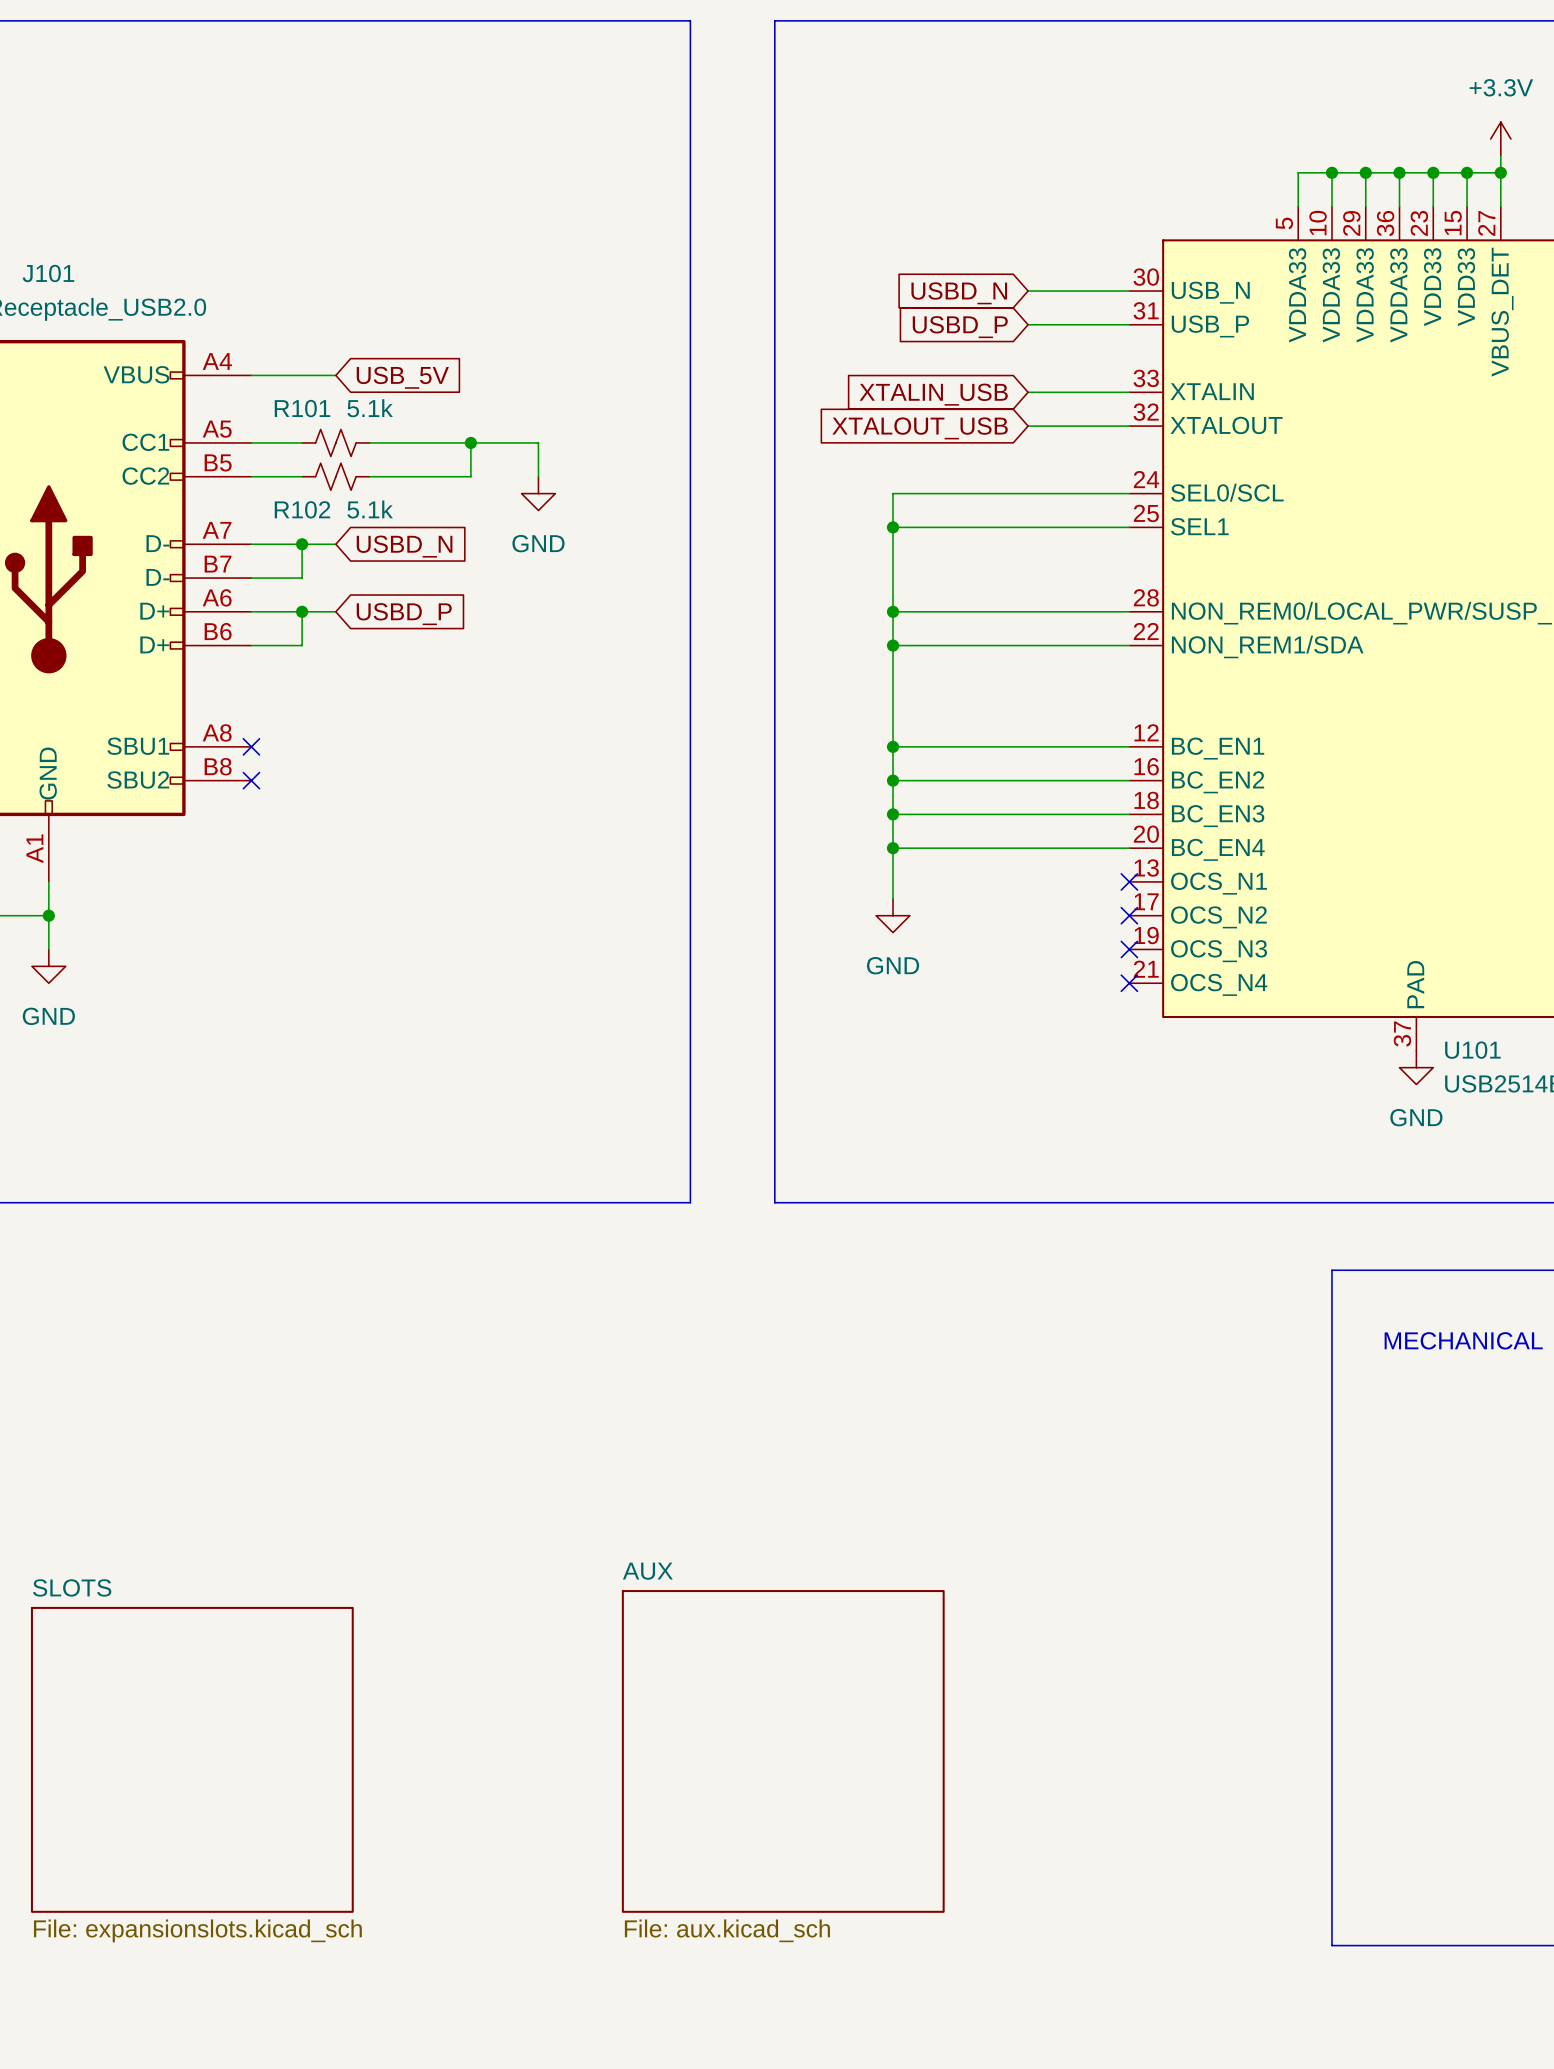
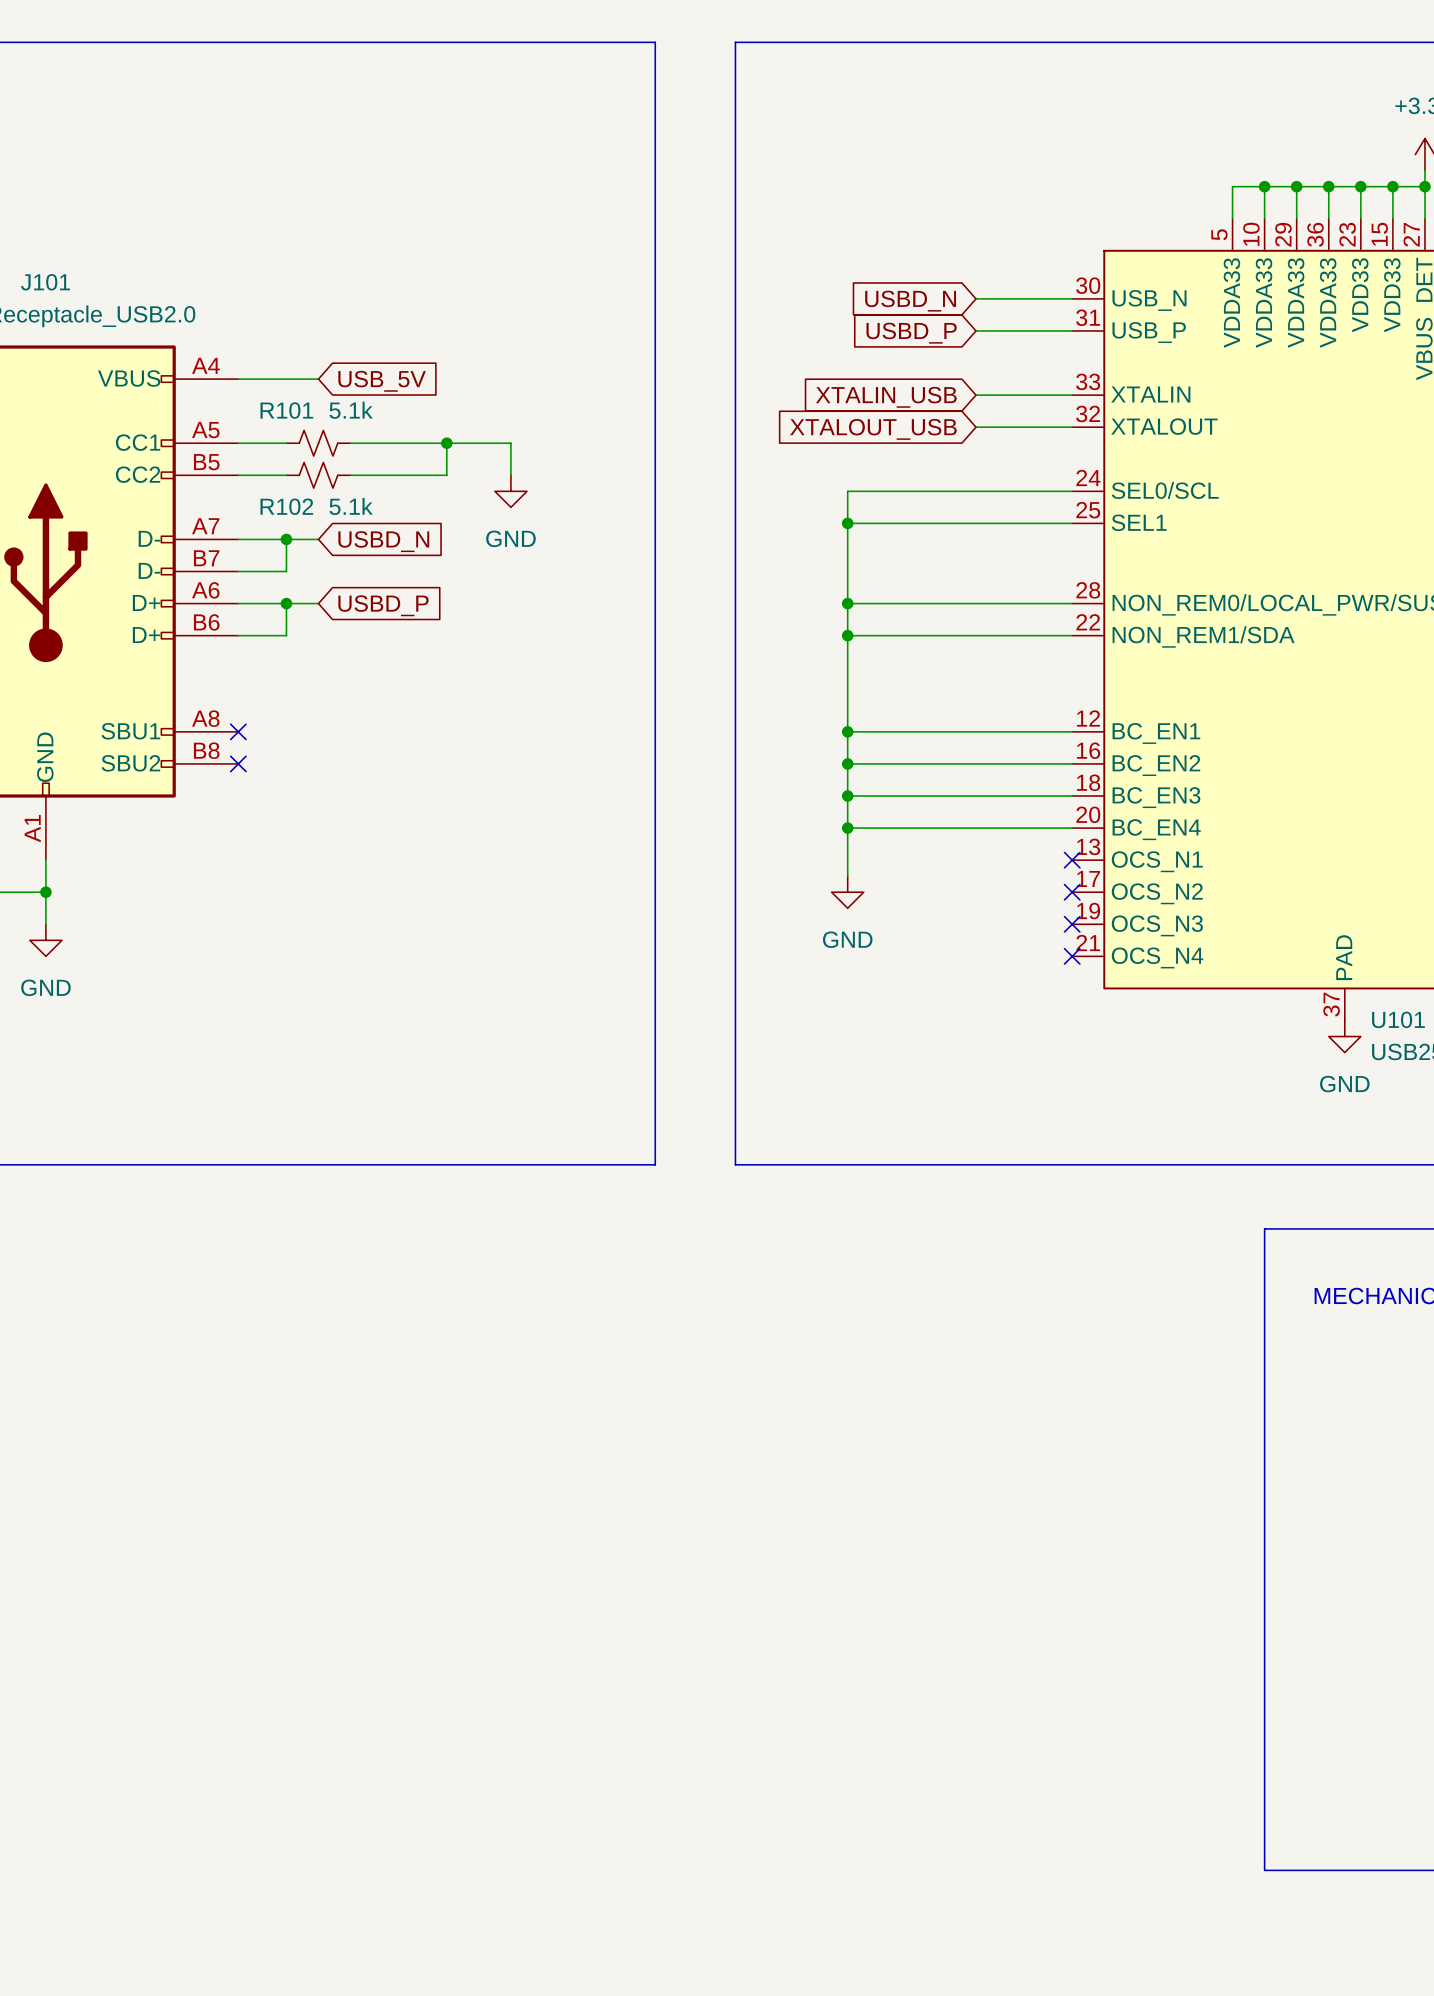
sheet AUX: File: aux.kicad_sch (783, 1751) -> none
sheet SLOTS: File: expansionslots.kicad_sch (192, 1759) -> none

